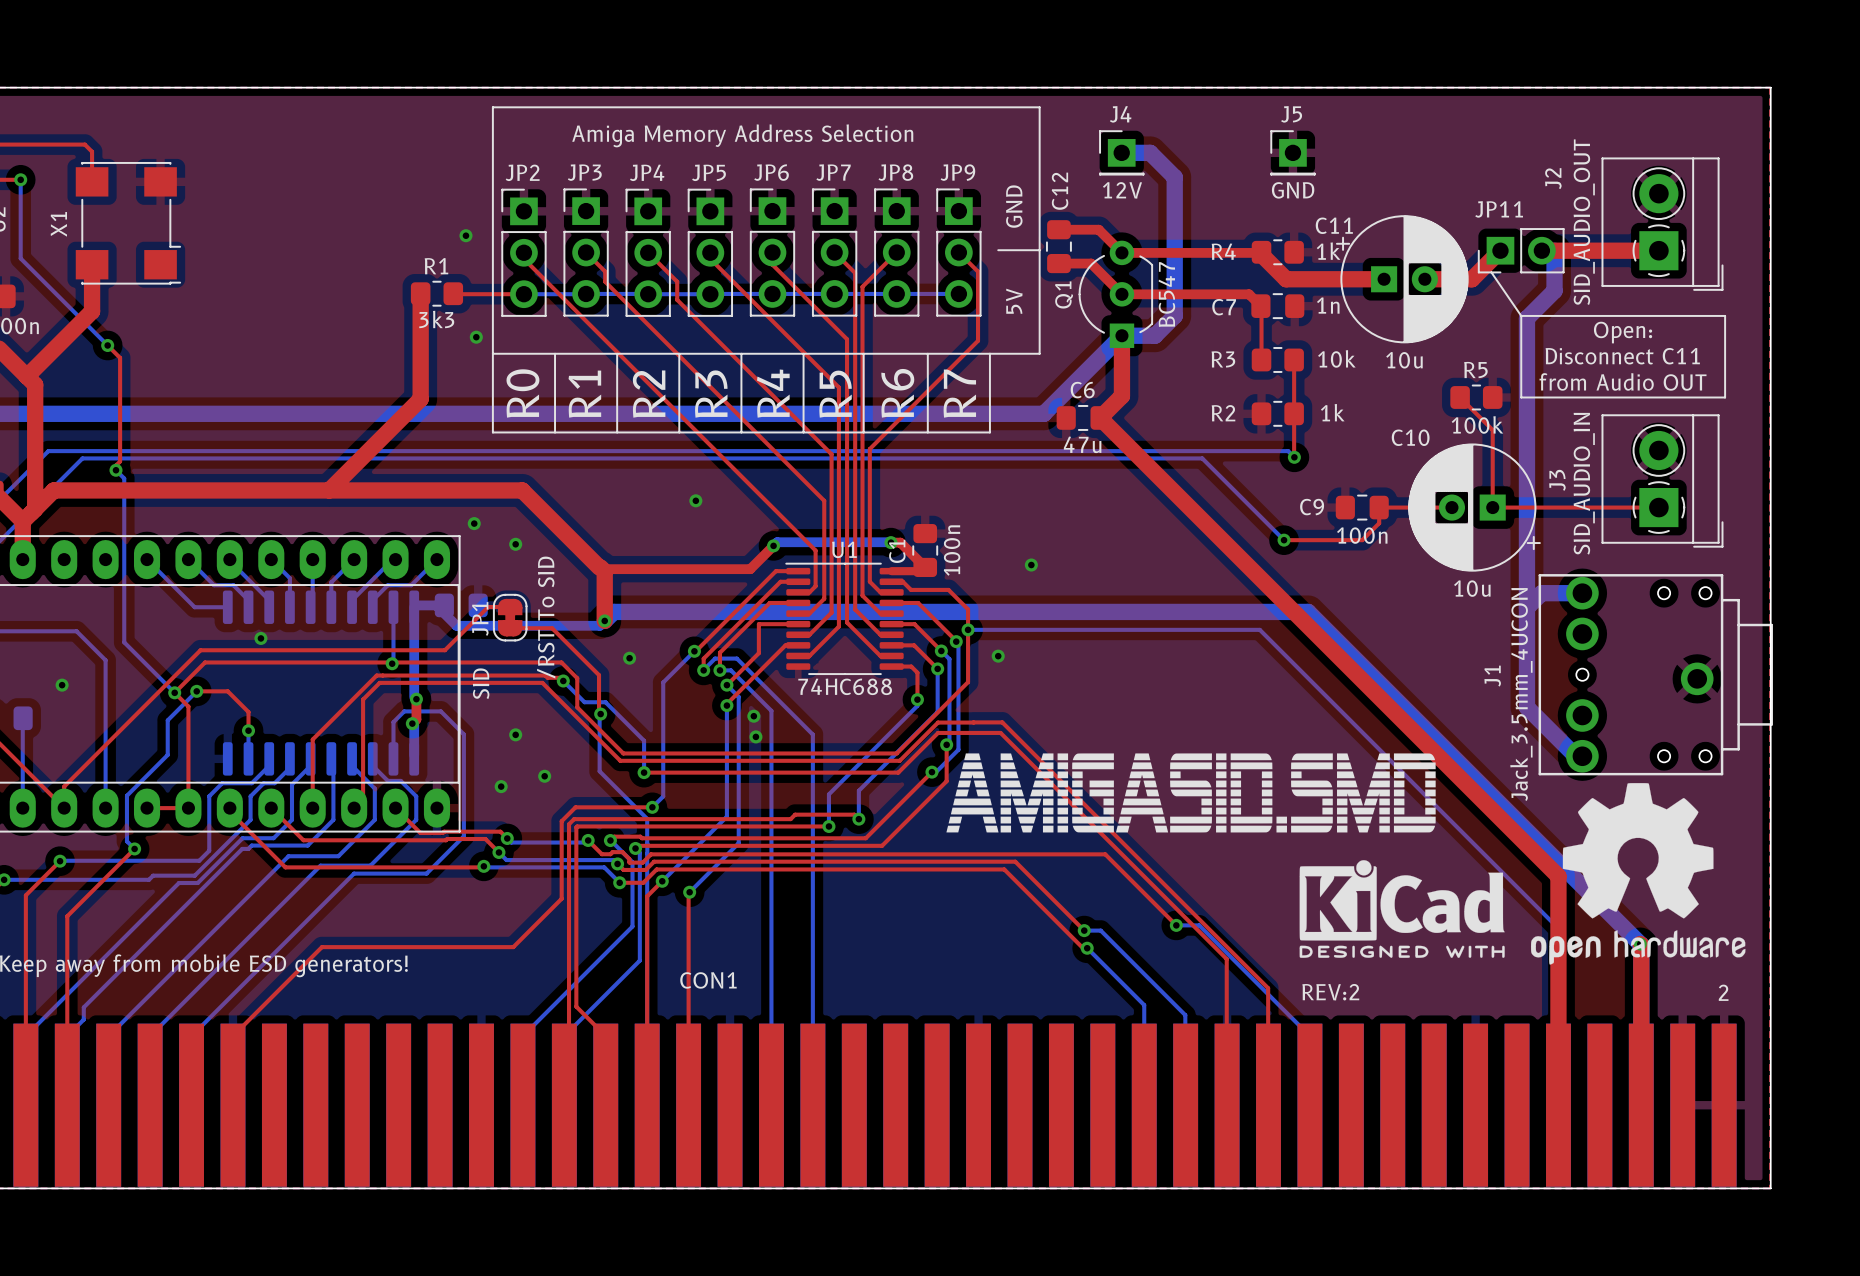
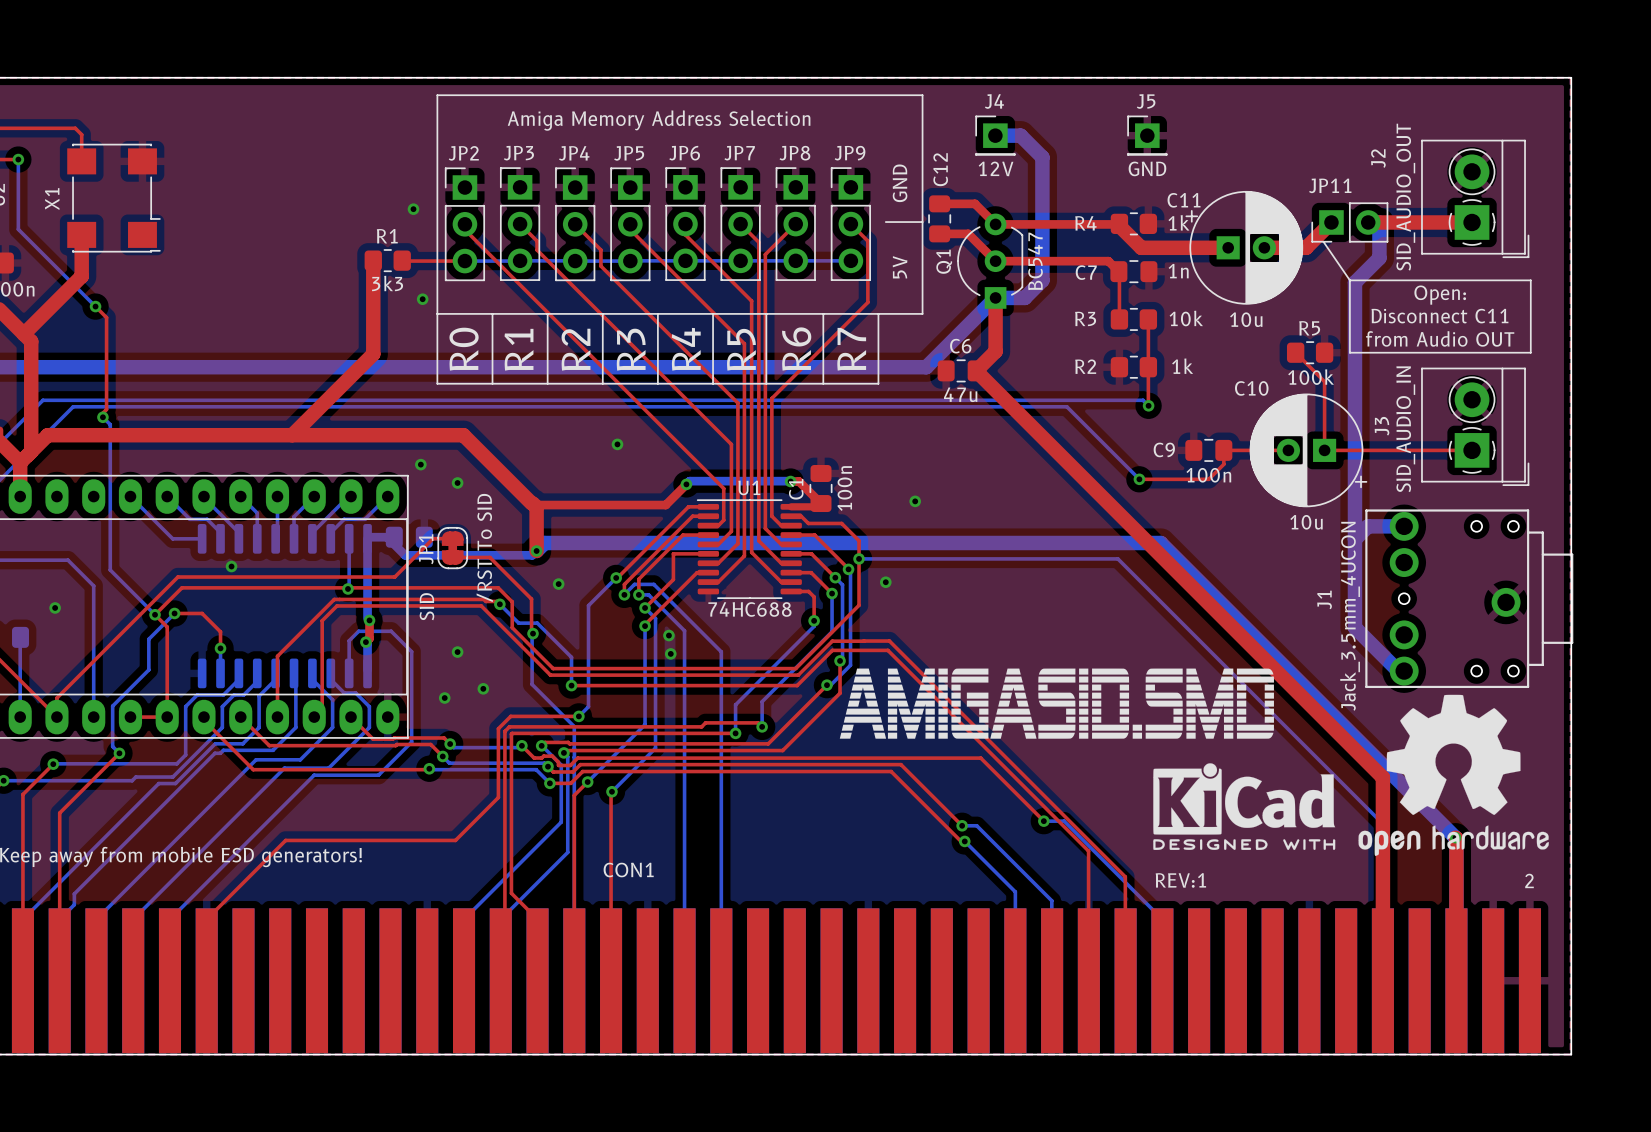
text: REV:2 (1330, 992) -> REV:1 (1180, 880)

